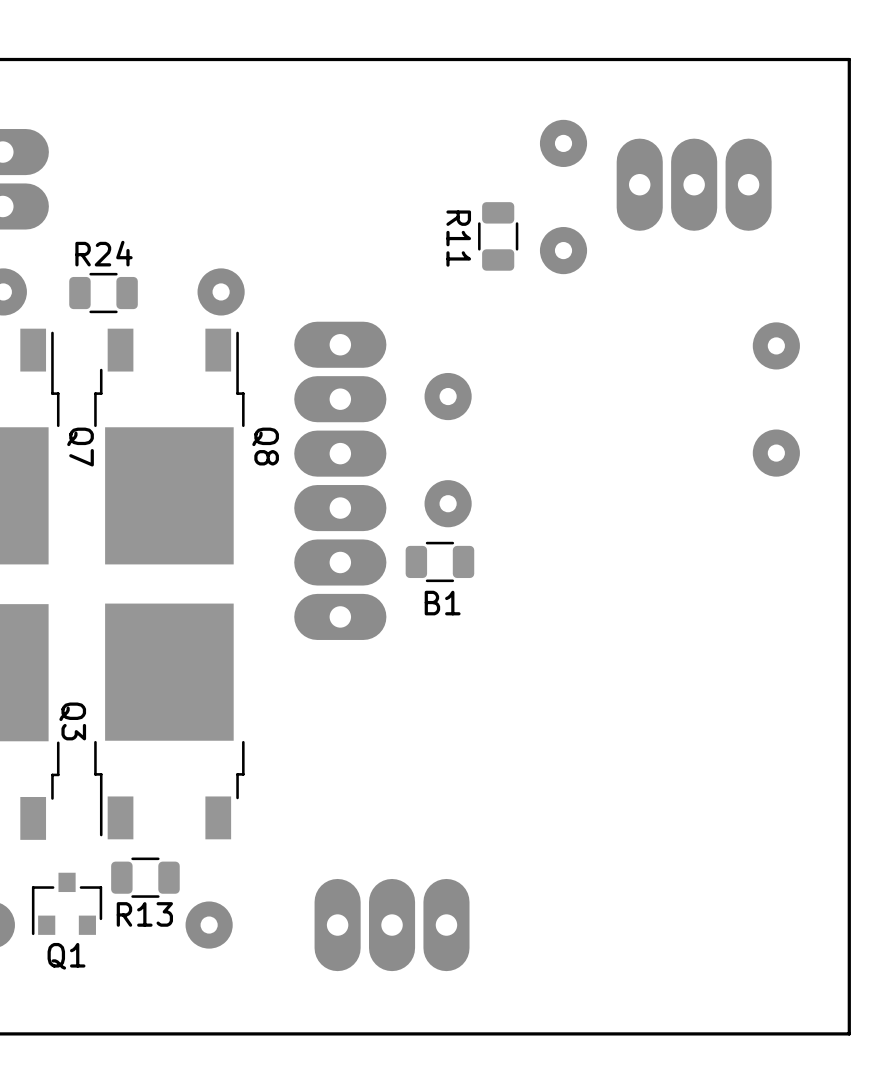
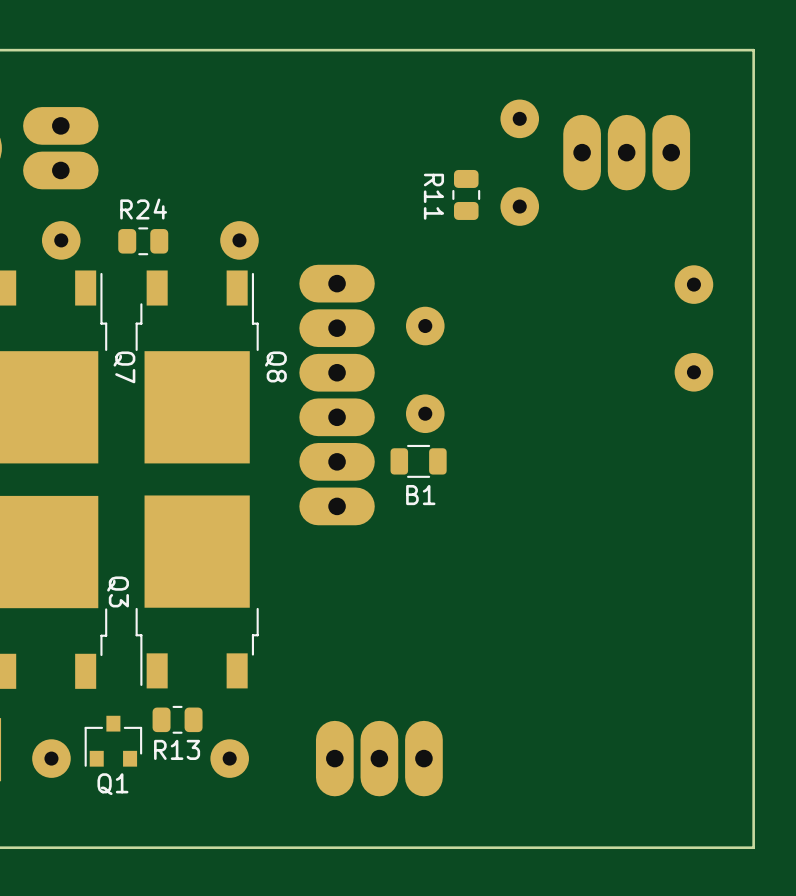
R11 footprint: [478, 202, 519, 271] -> [452, 169, 481, 220]
R24 footprint: [69, 272, 138, 314] -> [118, 227, 169, 256]
R13 footprint: [111, 857, 180, 898] -> [152, 705, 203, 734]

